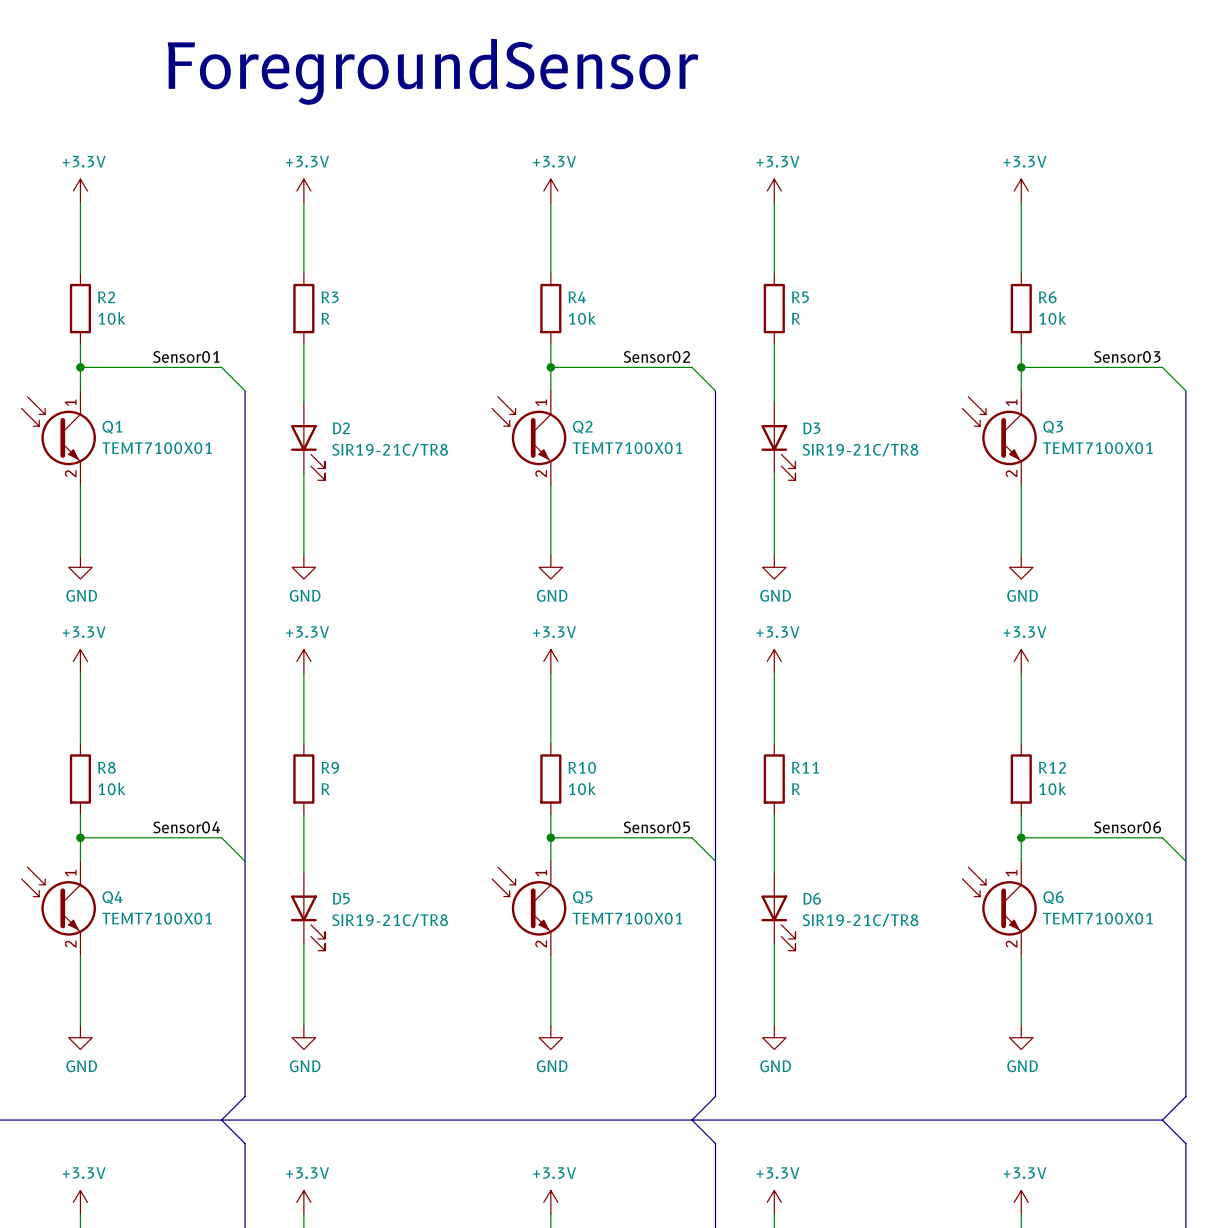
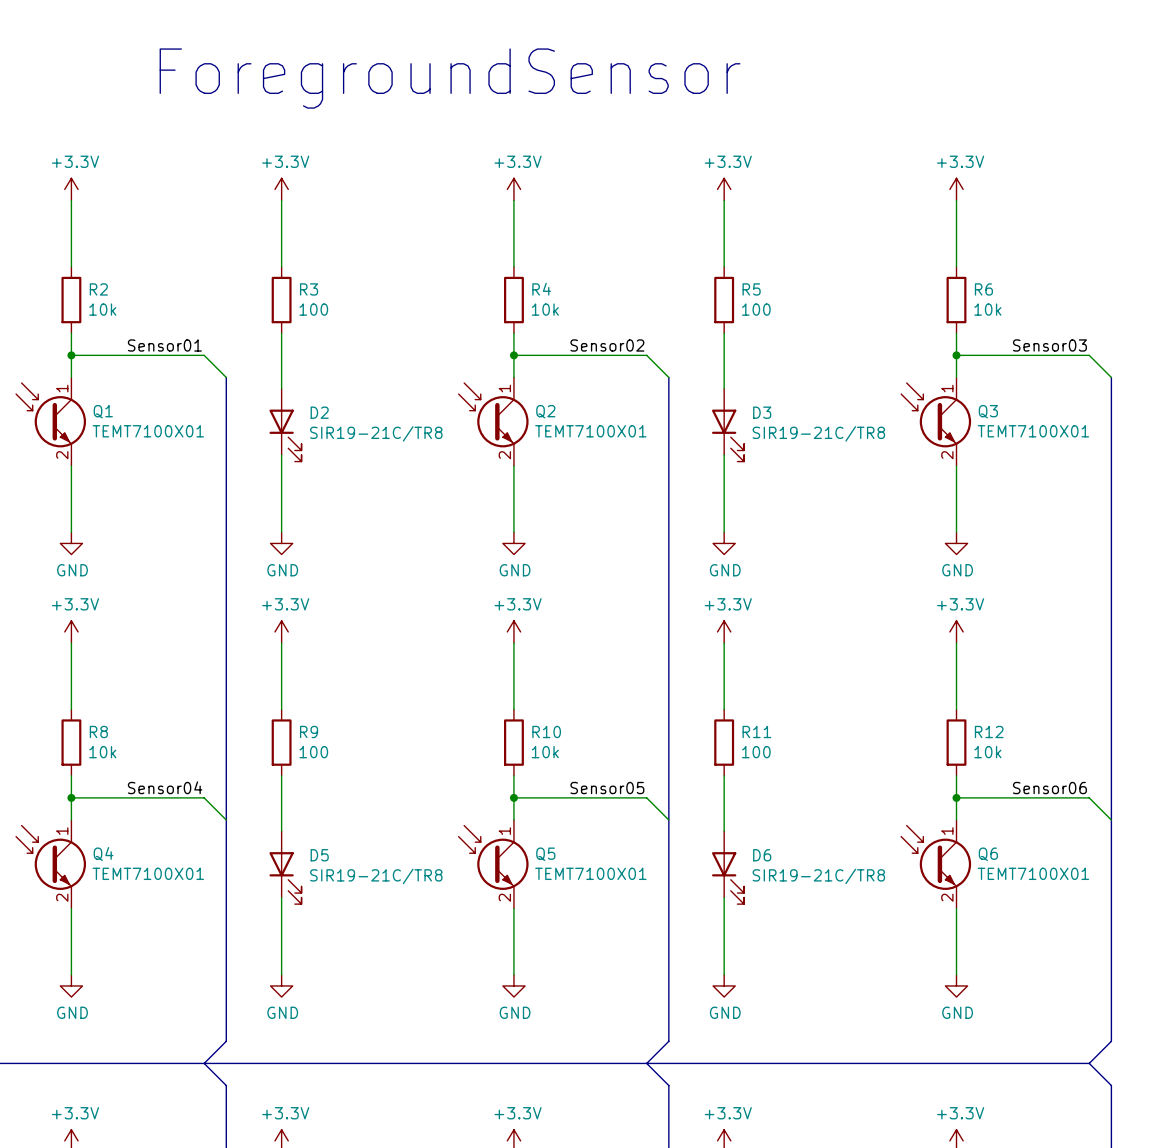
R3 value: R (325, 318) -> 100 (313, 309)
R5 value: R (796, 318) -> 100 (756, 309)
R9 value: R (325, 789) -> 100 (313, 752)
R11 value: R (796, 789) -> 100 (756, 752)

